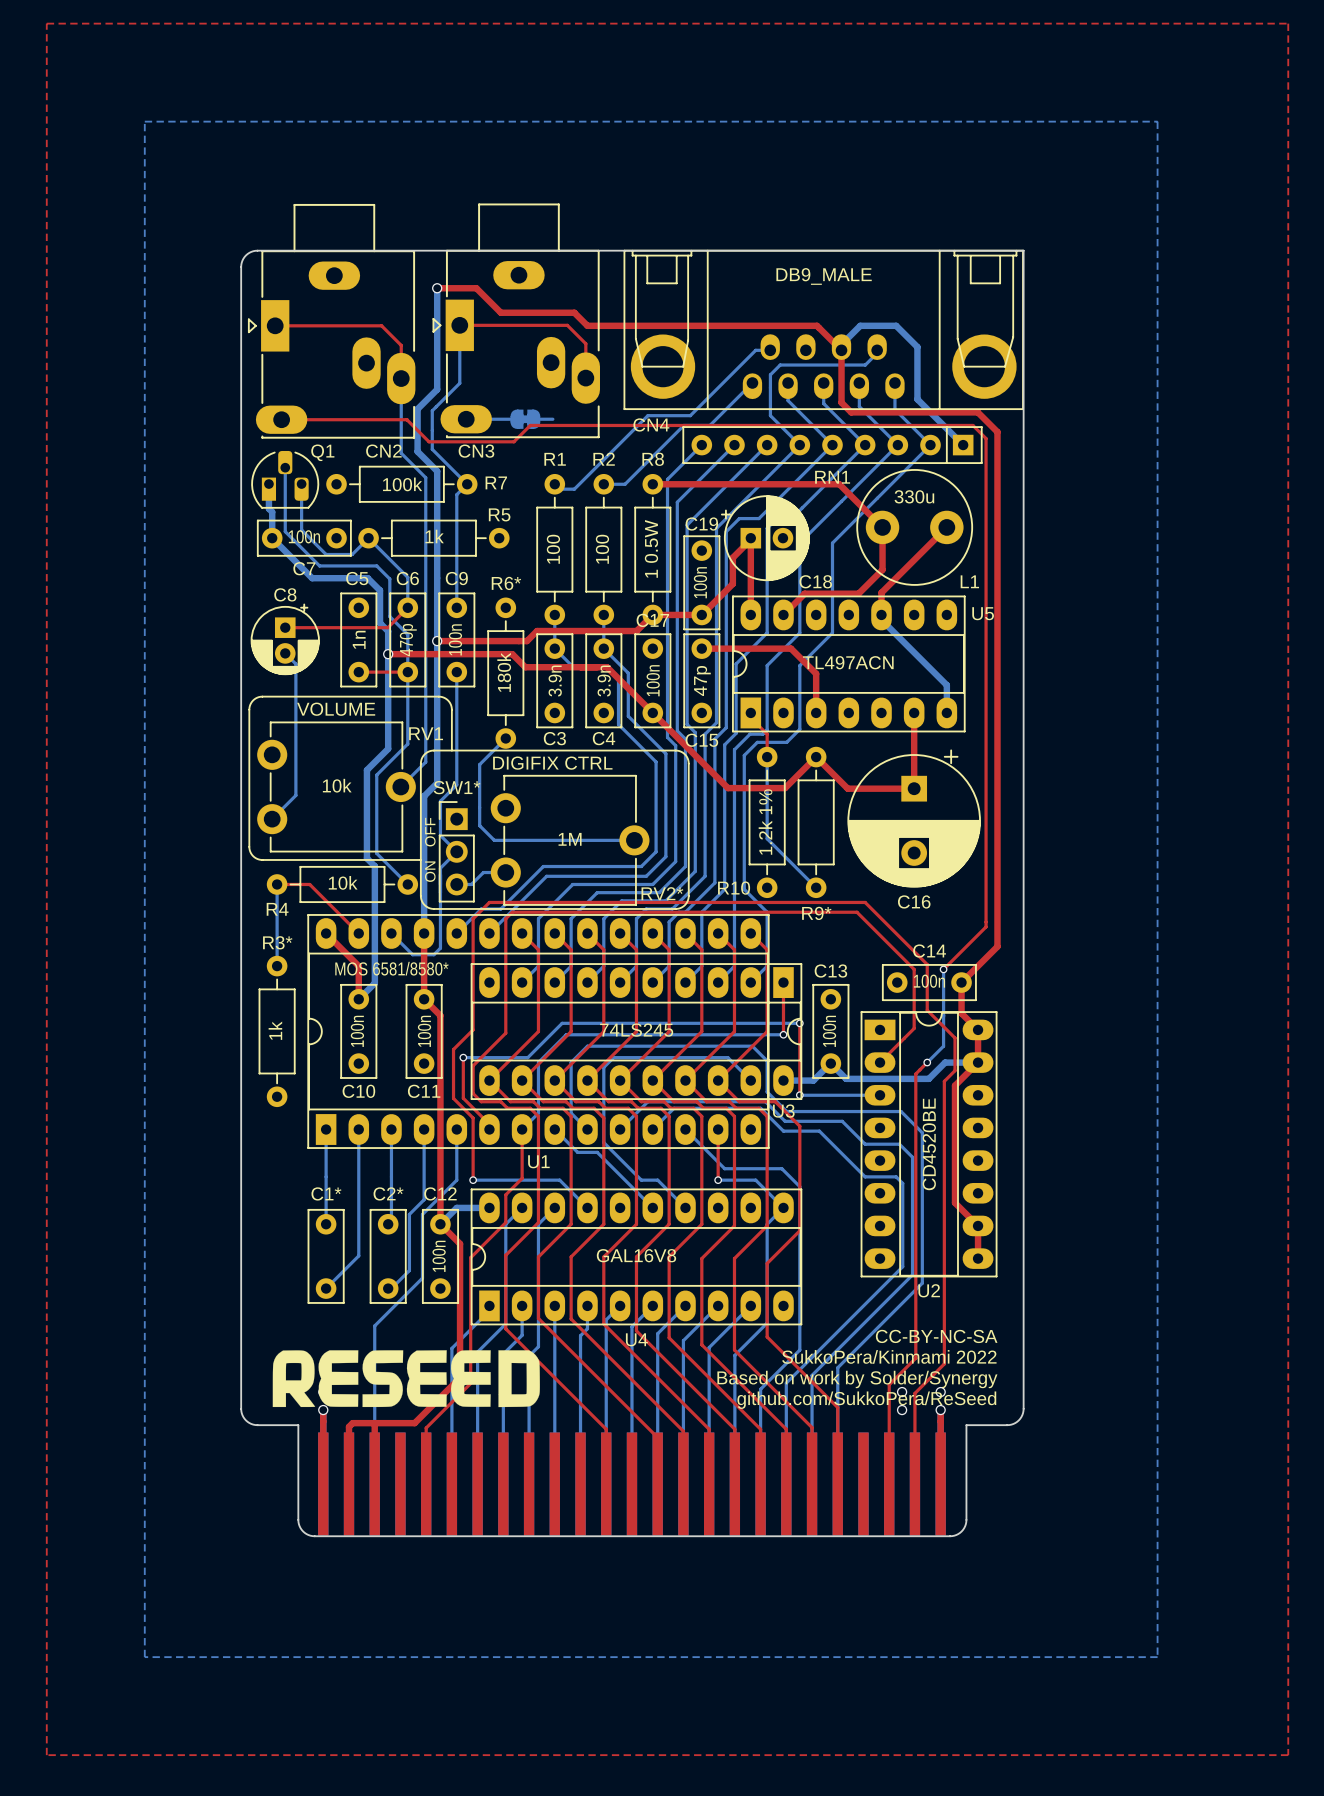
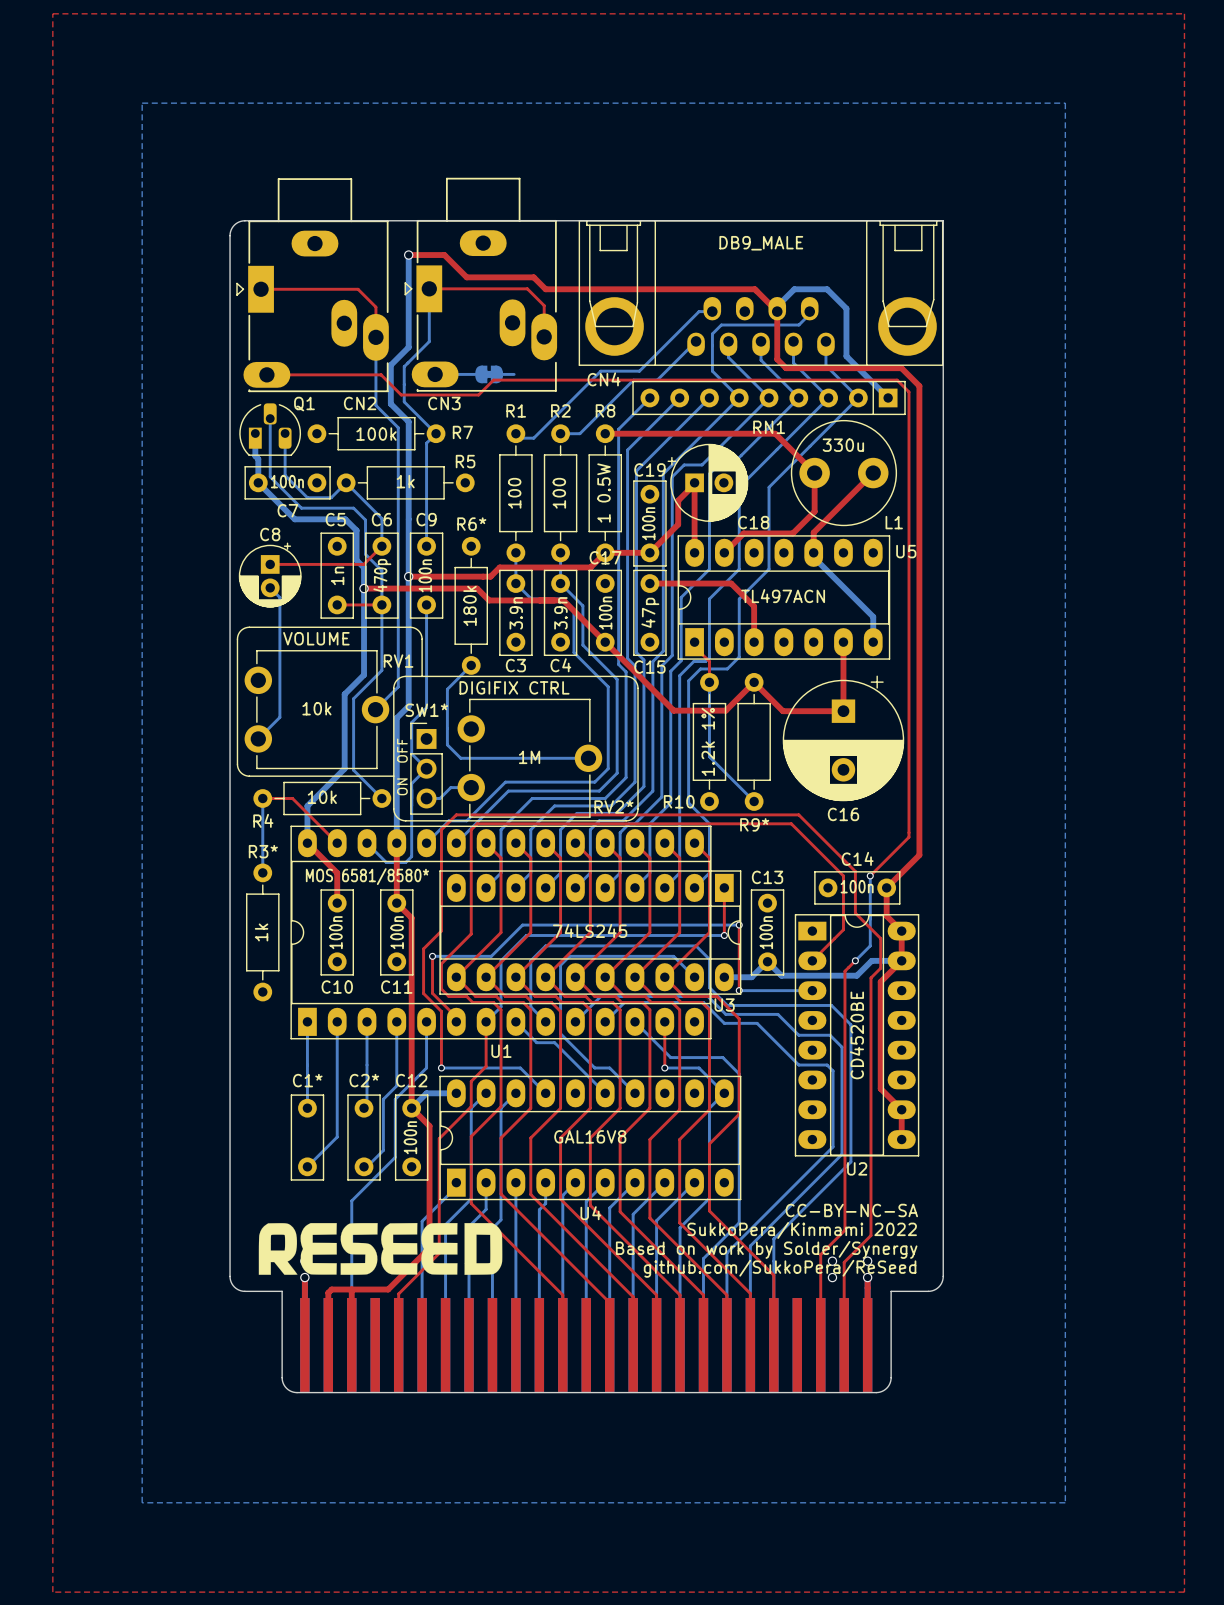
bottom track: (366, 851) (366, 858) (374, 866) (374, 983) (358, 999) -> (344, 768) (307, 805) (307, 843)

